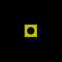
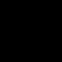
part: (30, 30) -> none

